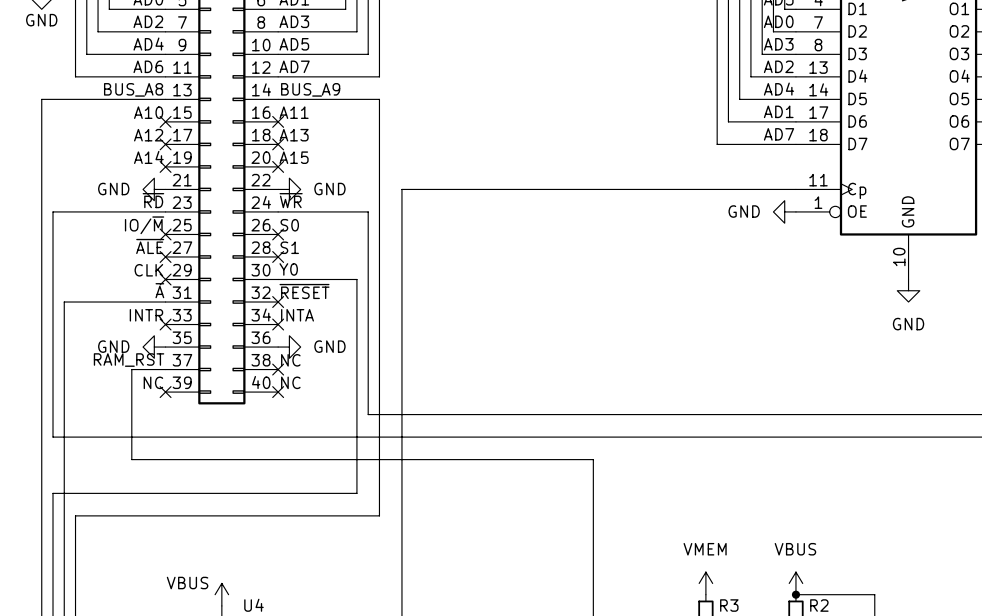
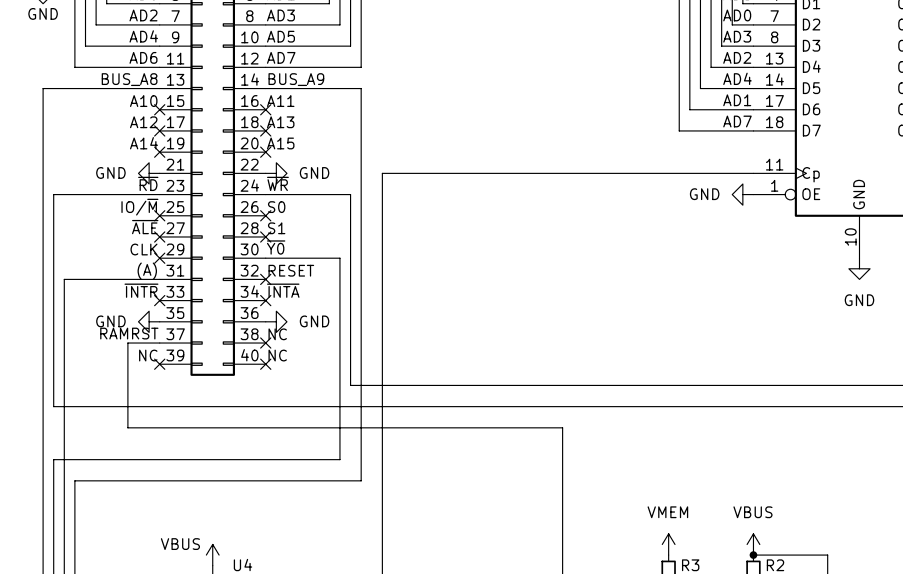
label: Y0 (288, 269) -> ~{Y0} (276, 247)
label: ~{A} (159, 290) -> (A) (147, 271)
text: ~{RESET} (304, 291) -> RESET (291, 270)
text: INTR (146, 315) -> ~{INTR} (141, 290)
text: INTA (297, 315) -> ~{INTA} (283, 290)
label: RAM_RST (129, 360) -> RAMRST (129, 333)

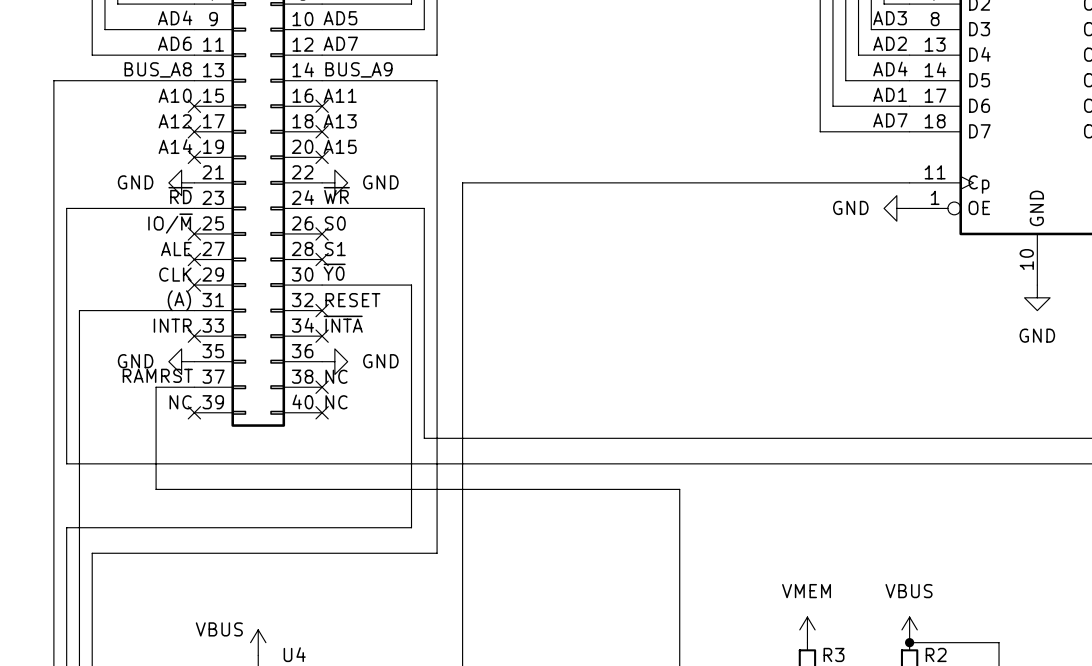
text: ~{ALE} (145, 227) -> ALE (176, 249)
text: ~{INTR} (141, 290) -> INTR (172, 325)

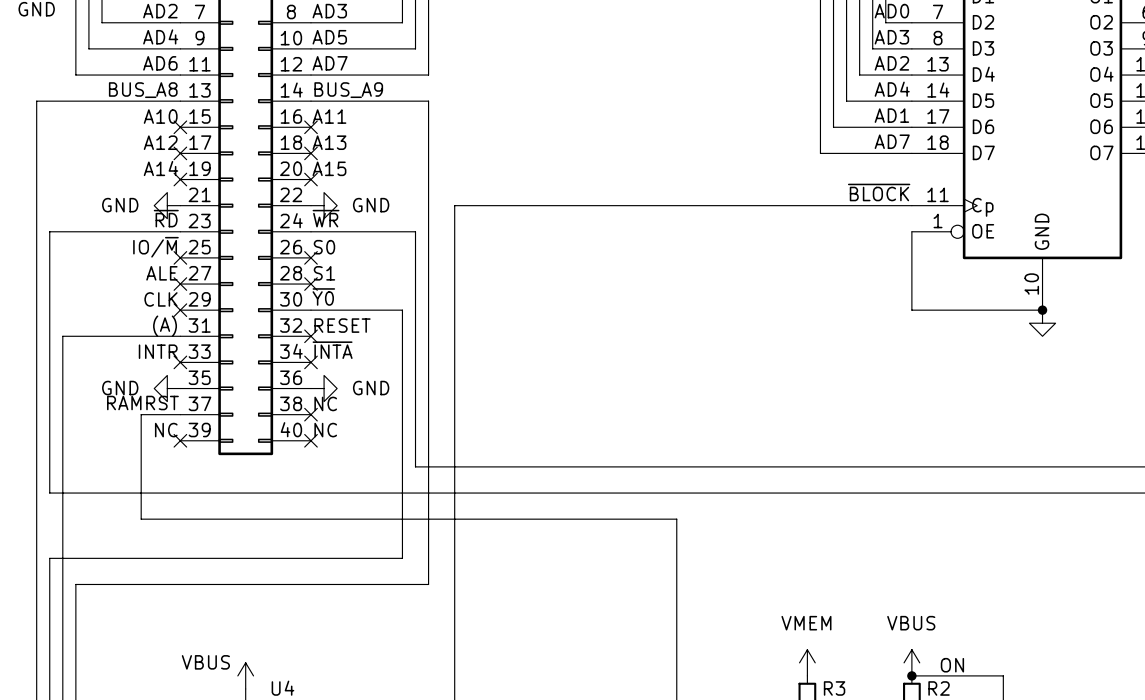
label: none -> ~{BLOCK} (879, 192)
power symbol: GND (896, 208) -> none
wire: none -> (911, 231) (911, 310) (1042, 310)
junction: none -> (1042, 310)
power symbol text: GND (1037, 335) -> none
text: none -> ON (952, 665)

